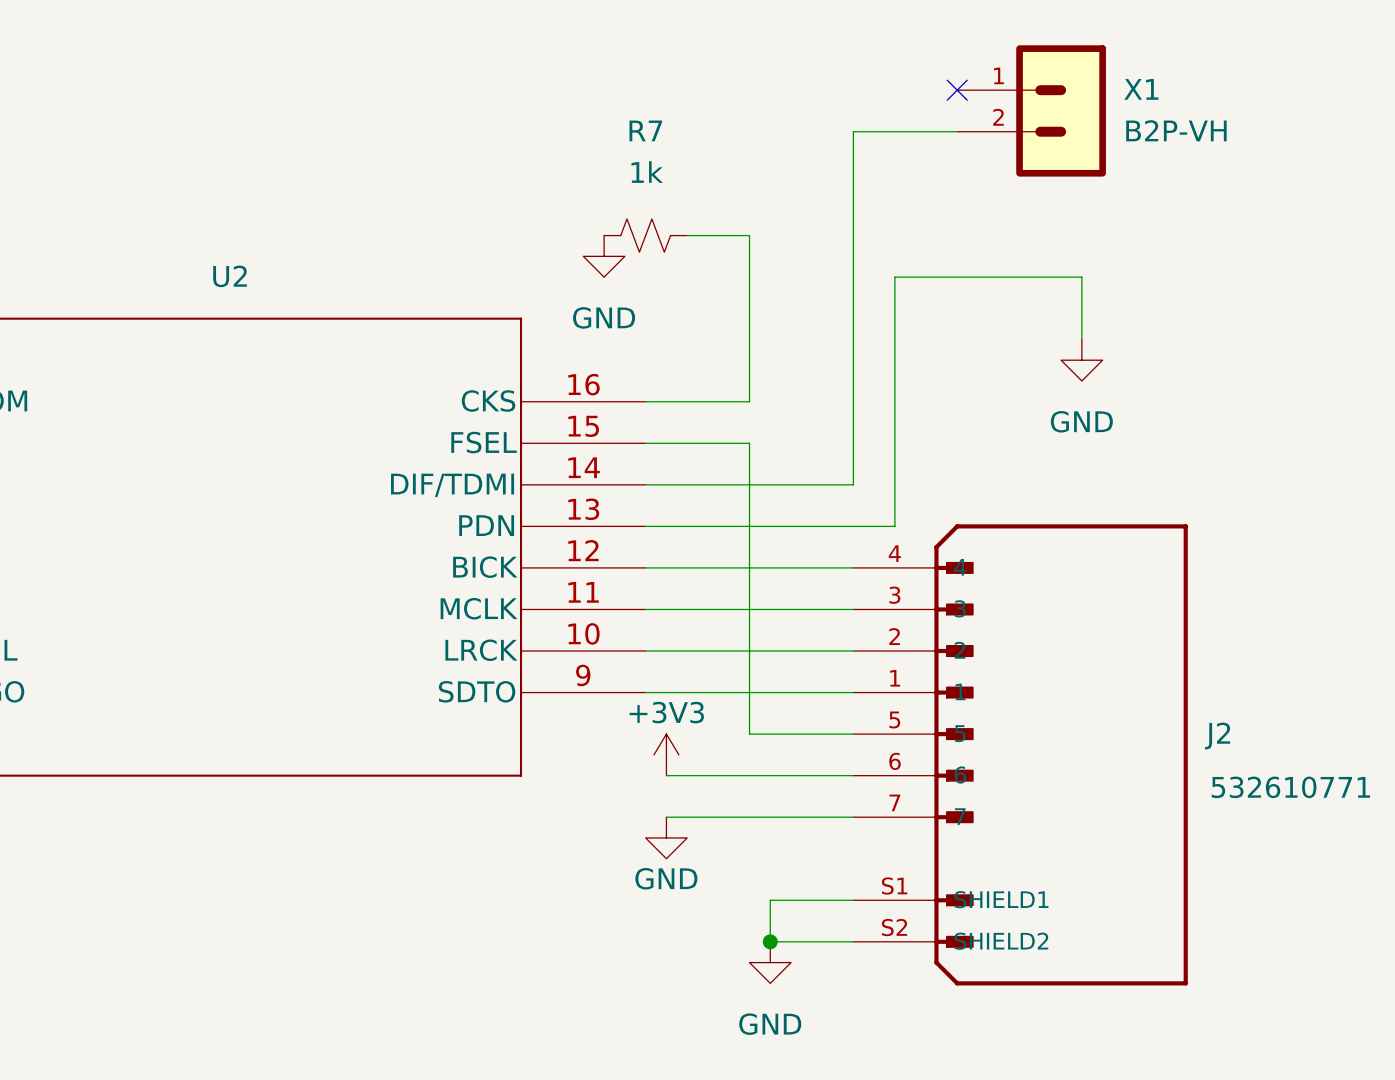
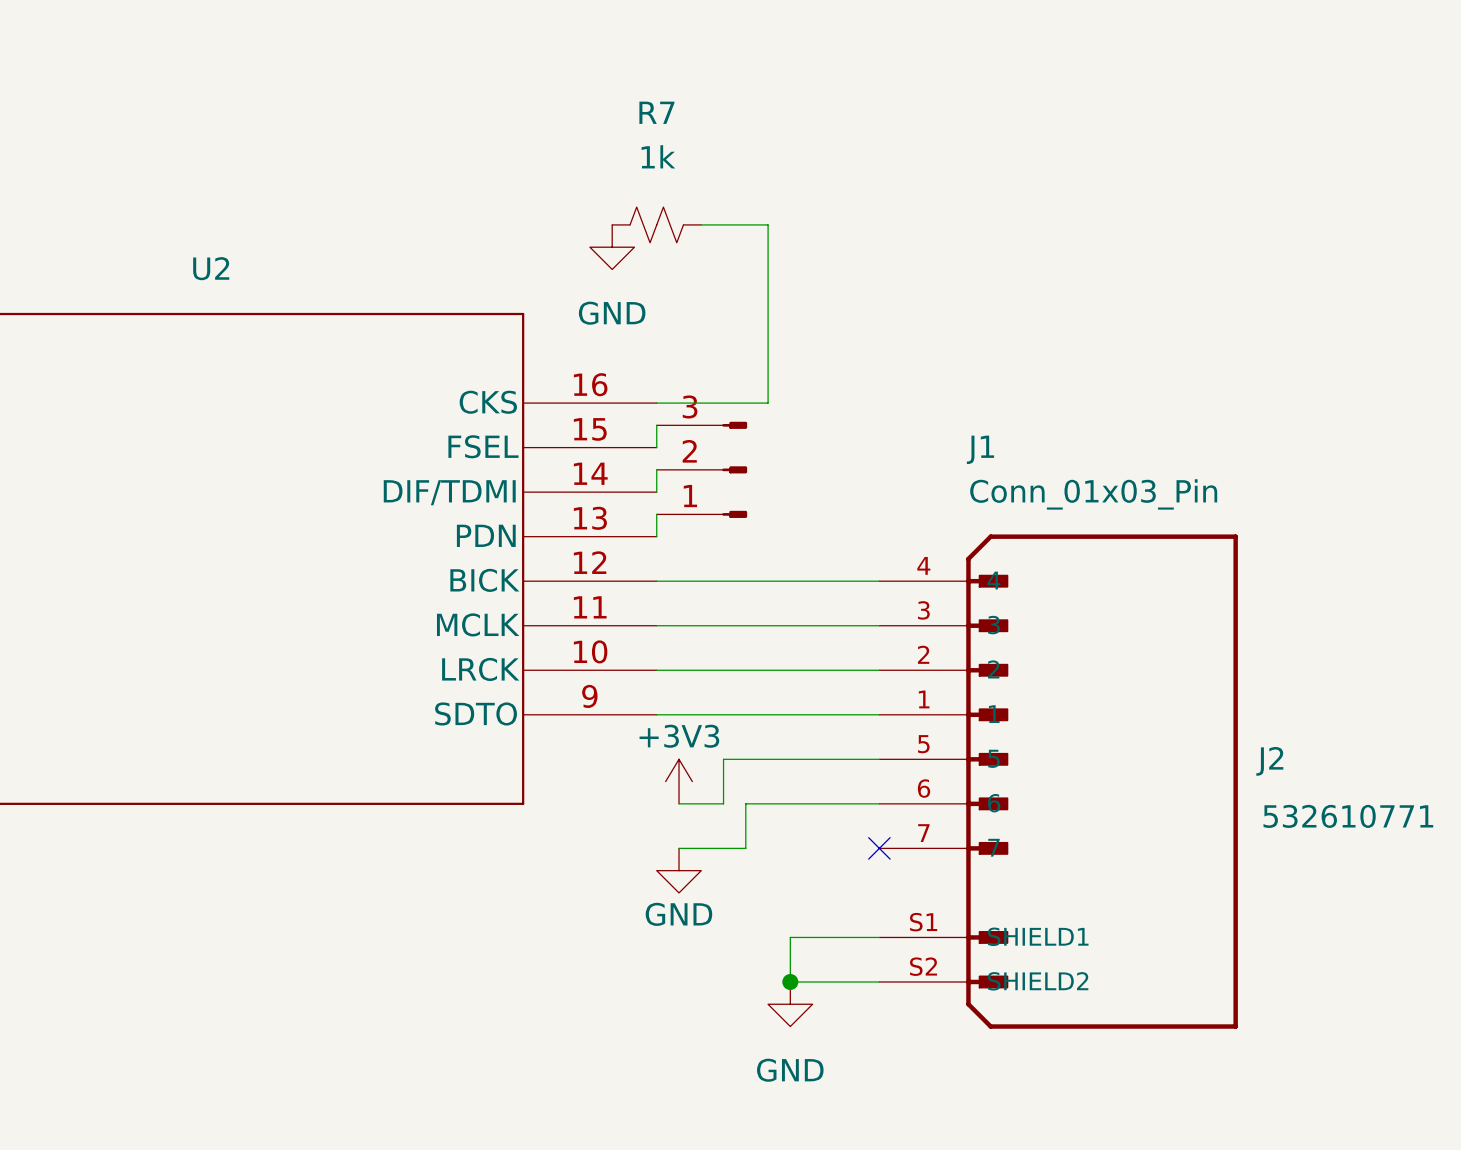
no-connect mark: (957, 90) -> none
X1: B2P-VH (1031, 110) -> none
wire: (957, 131) (853, 131) (853, 484) (645, 484) -> (656, 469) (656, 492)
wire: (1081, 339) (1081, 277) (894, 277) (894, 526) (645, 526) -> (656, 514) (656, 536)
power symbol: GND (1081, 360) -> none
wire: (645, 443) (749, 443) (749, 734) -> (656, 447) (656, 425)
J1: none -> Conn_01x03_Pin (701, 469)
wire: (707, 775) (728, 775) -> (723, 803) (723, 759) (768, 759)
wire: (728, 817) (853, 817) -> (745, 848) (745, 803)
no-connect mark: none -> (879, 848)

